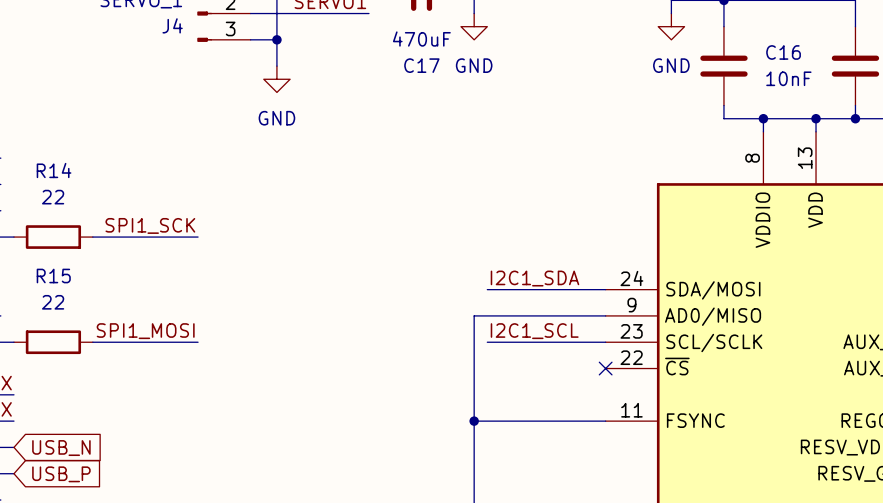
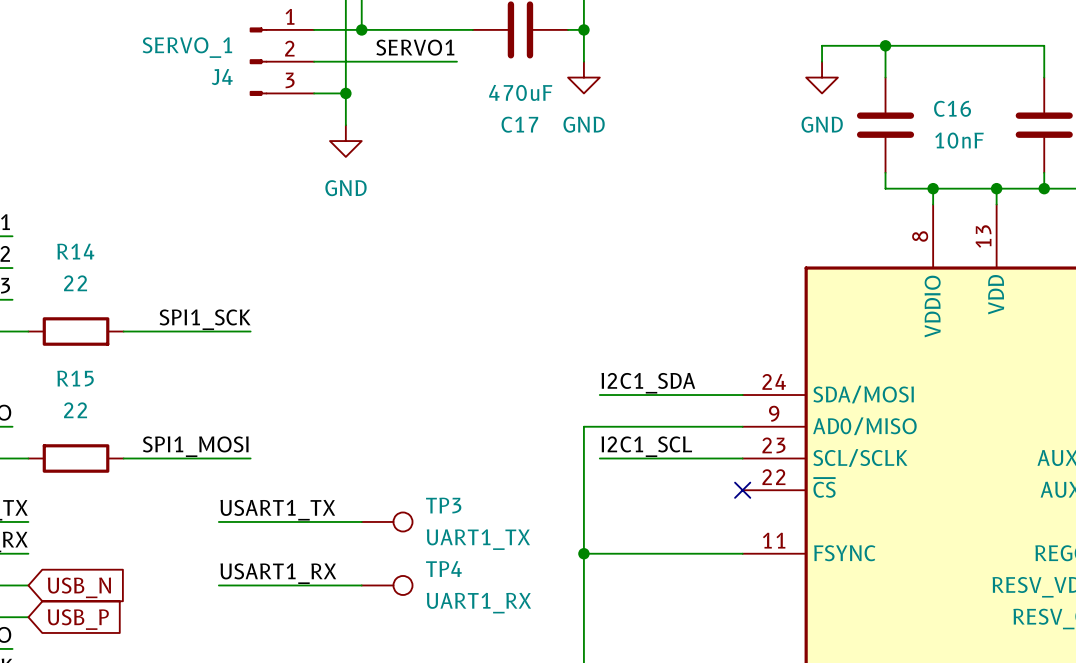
label: none -> USART1_TX (277, 510)
wire: none -> (218, 521) (361, 521)
TP3: none -> UART1_TX (387, 521)
label: none -> USART1_RX (278, 573)
wire: none -> (218, 585) (361, 585)
TP4: none -> UART1_RX (387, 585)

